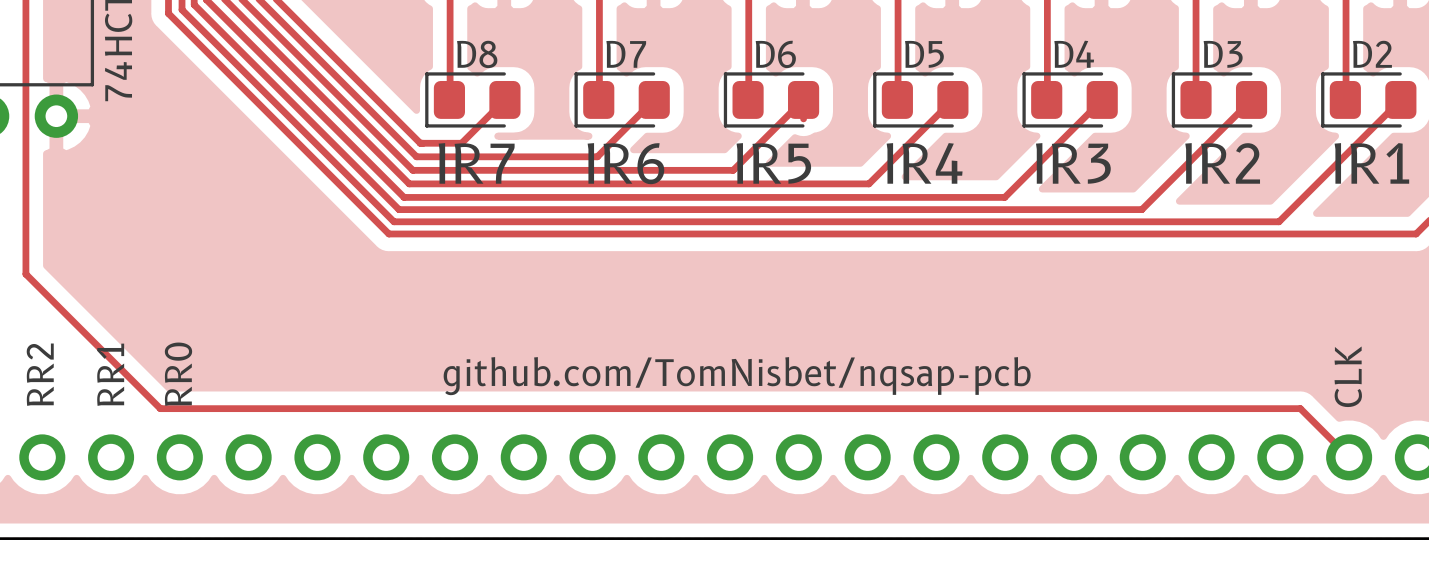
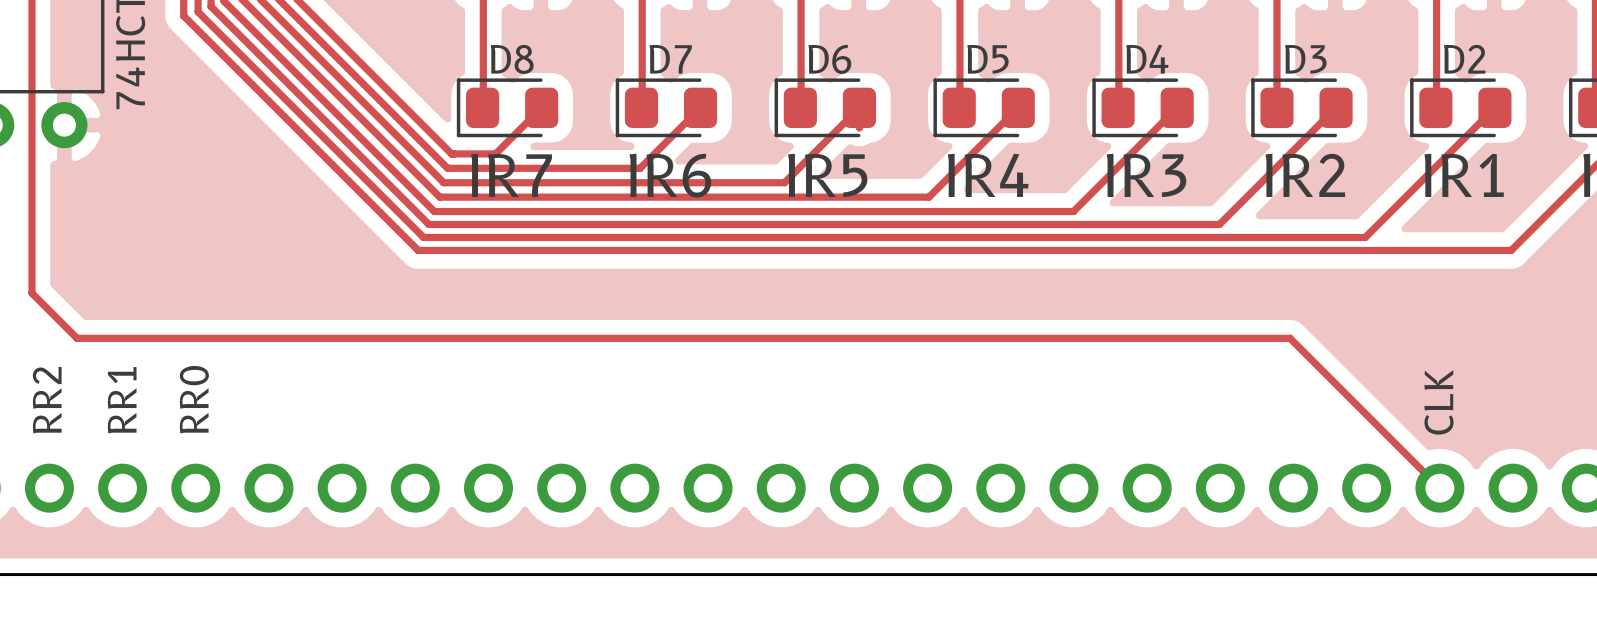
track: (68, 316) (160, 408) (1300, 408) -> (77, 338) (1290, 338) (1388, 436)
text: github.com/TomNisbet/nqsap-pcb (737, 376) -> none

